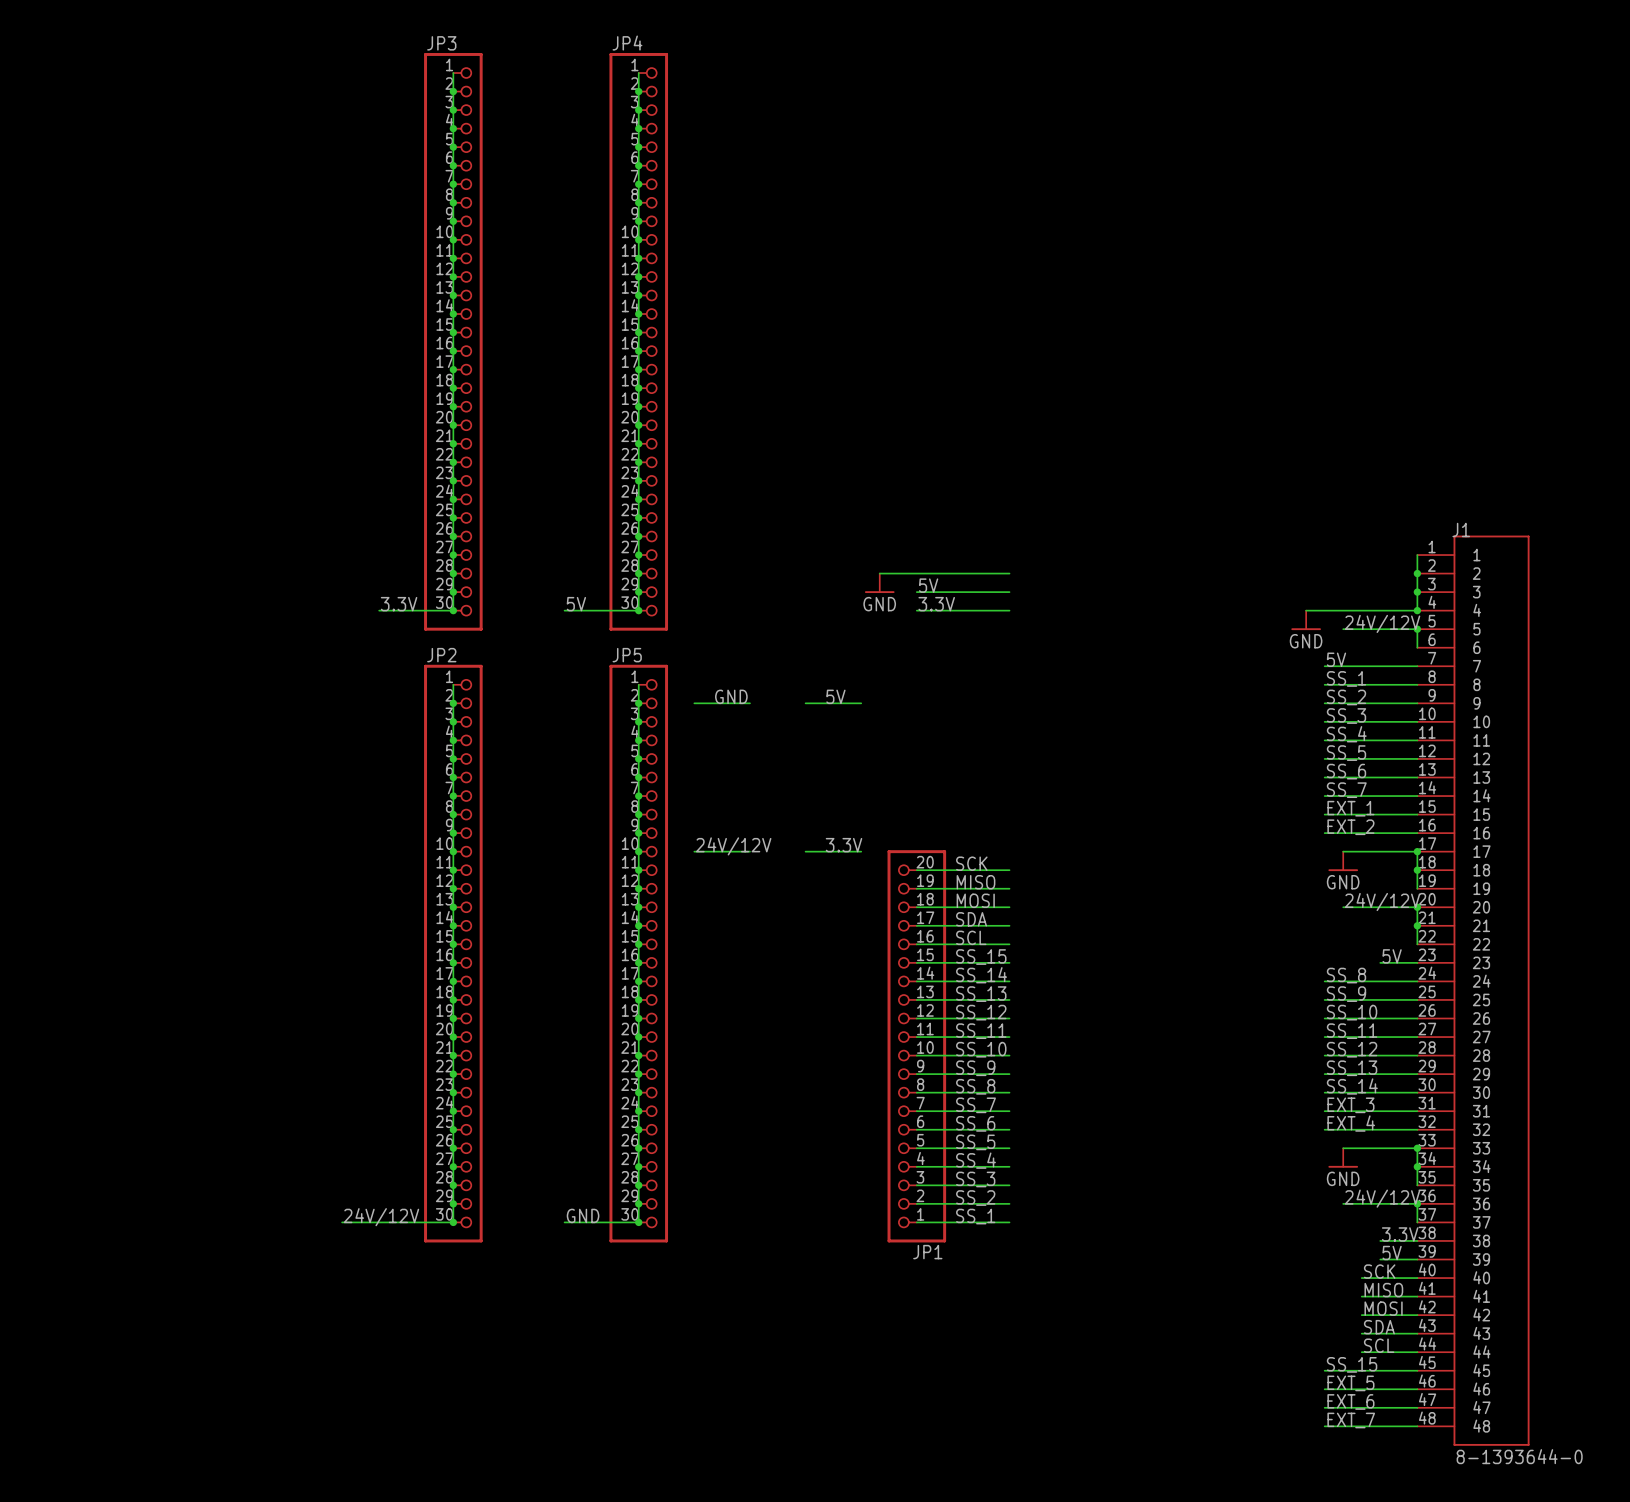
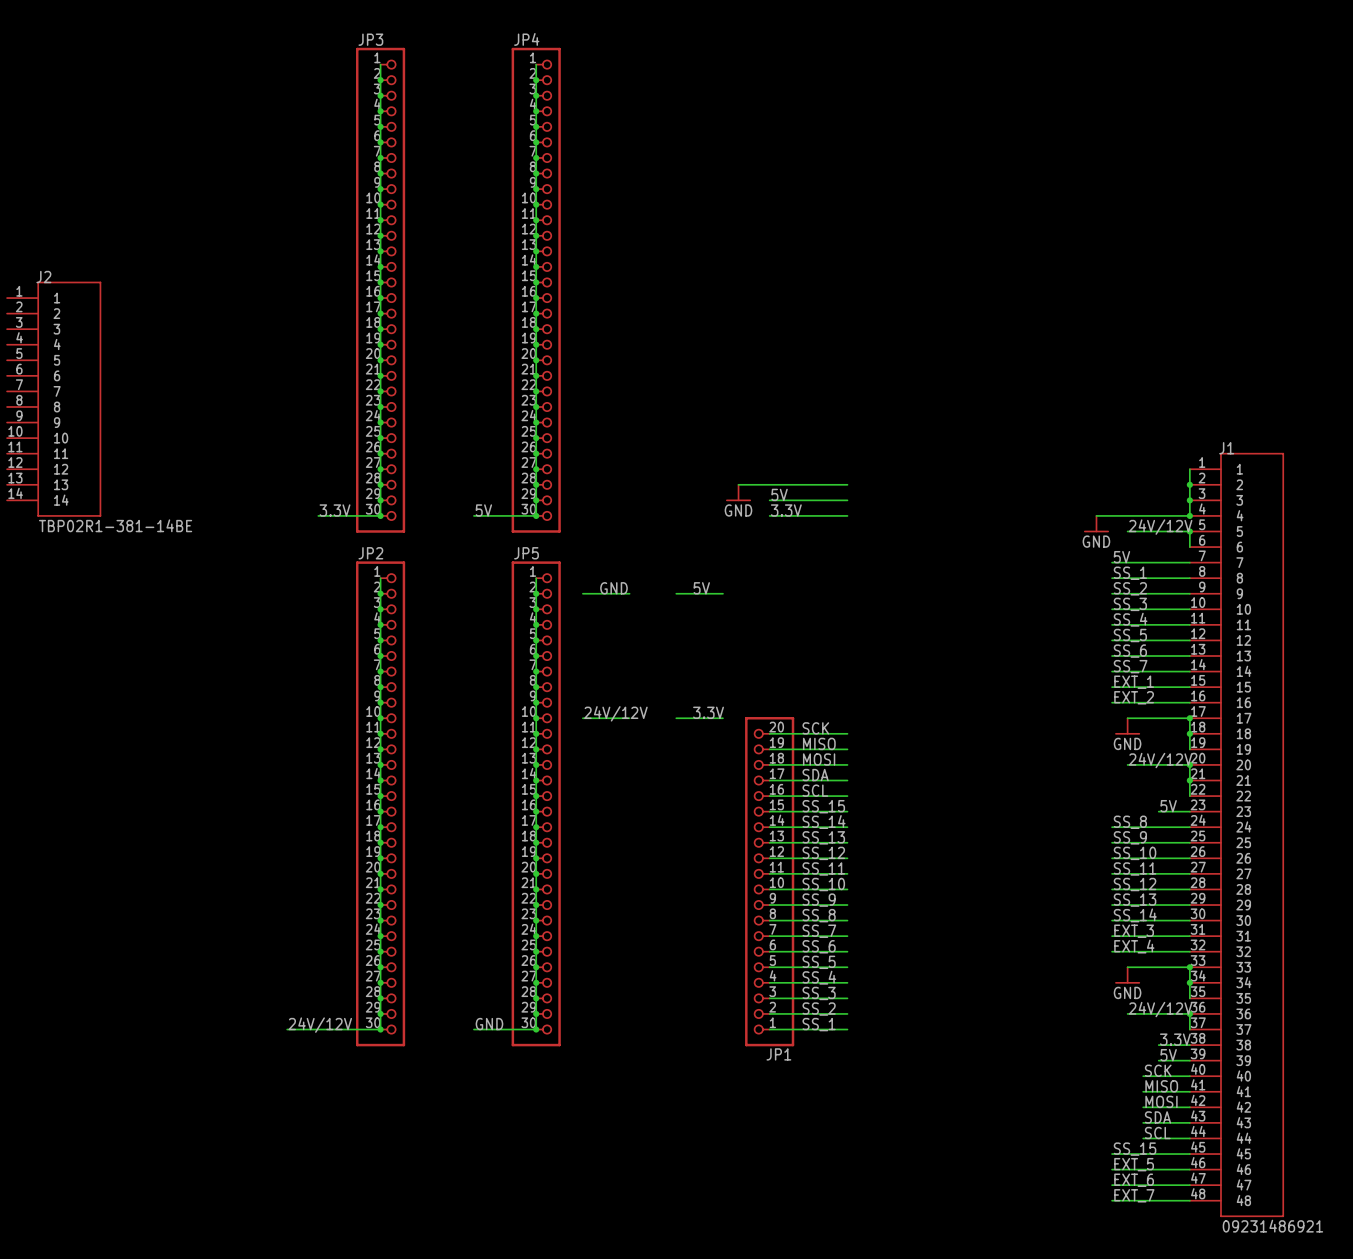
J2: none -> TBP02R1-381-14BE (54, 399)
J1 value: 8-1393644-0 (1519, 1456) -> 09231486921 (1272, 1226)

